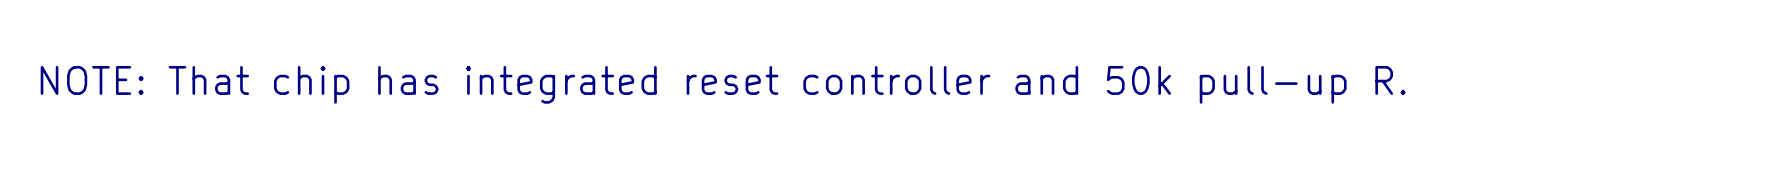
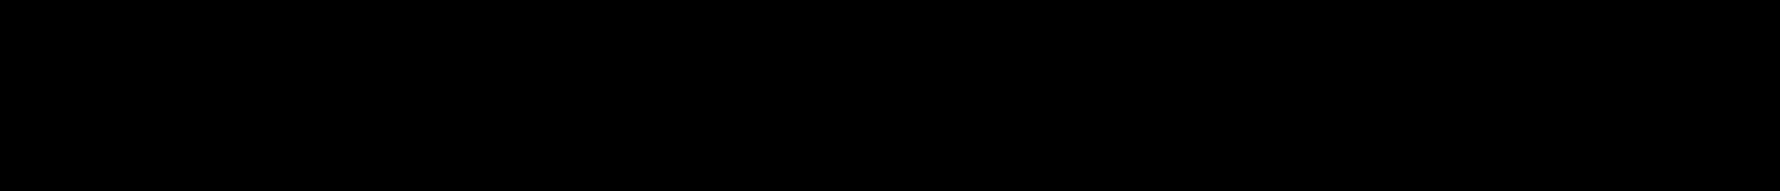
text: NOTE: That chip has integrated reset controller and 50k pull-up R. (723, 84) -> none

